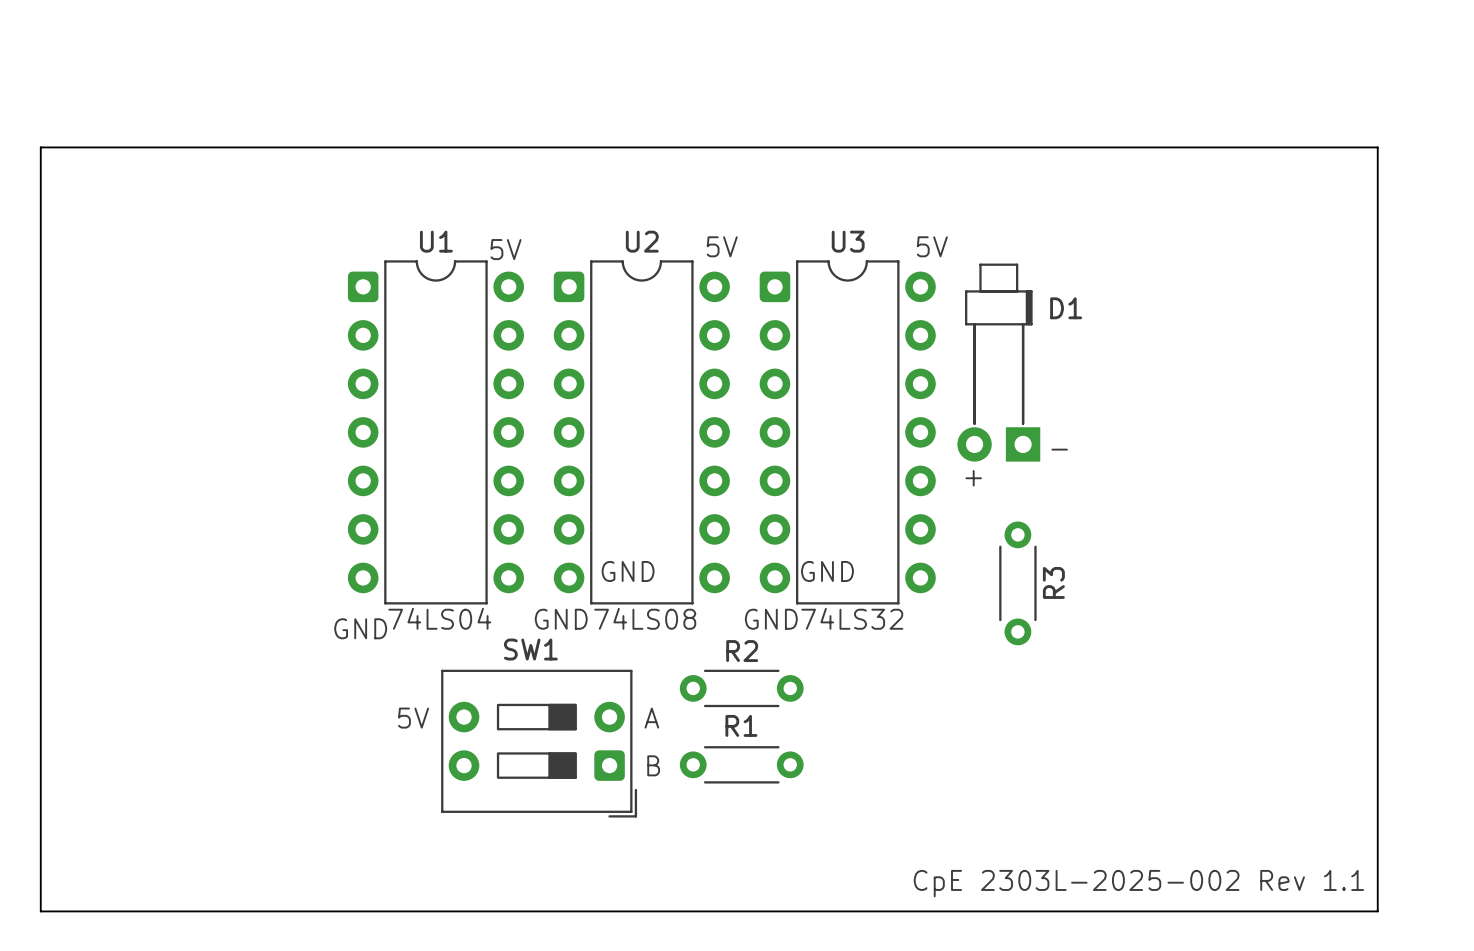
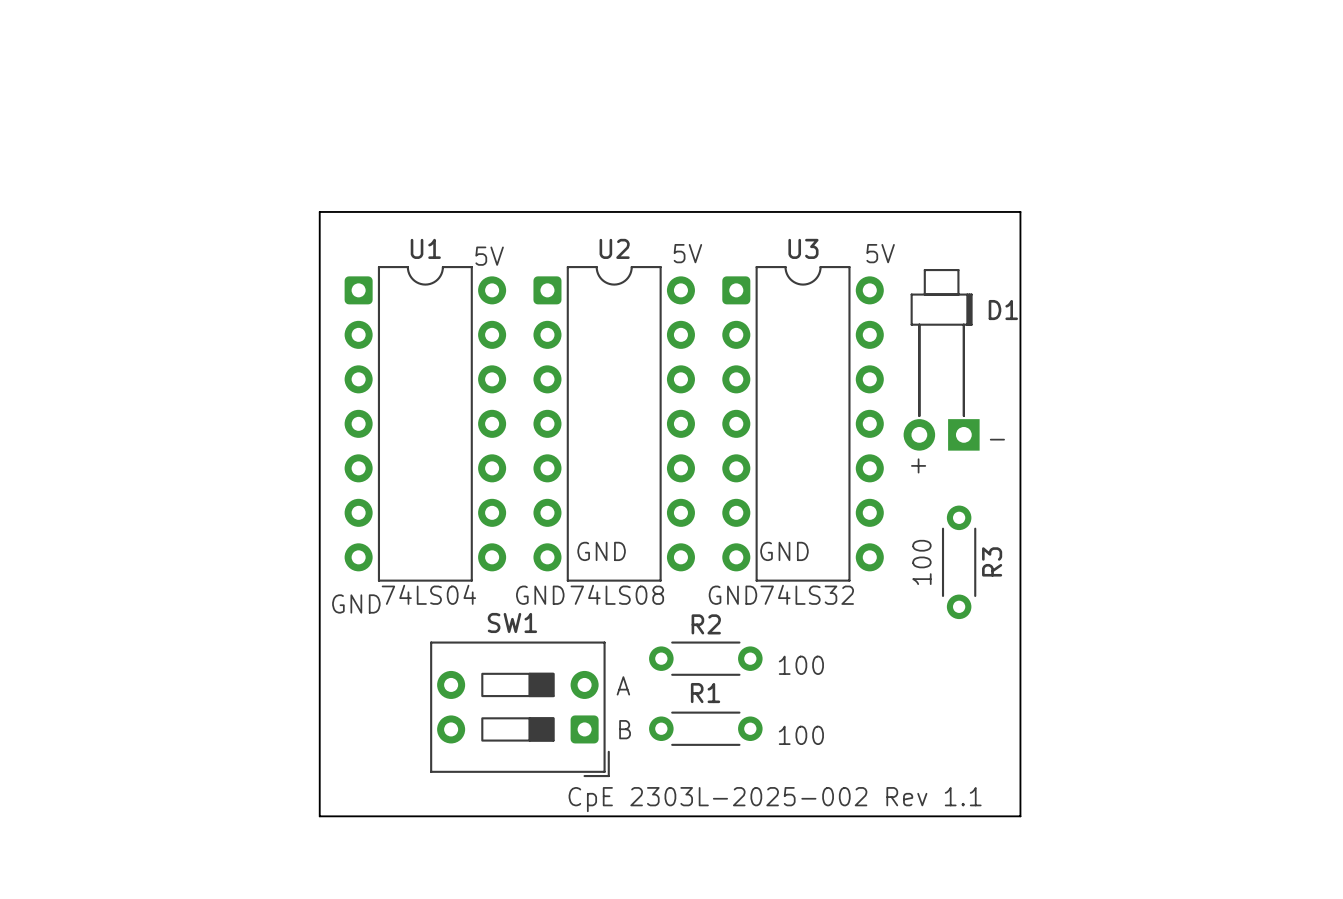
board edge: (40, 147) (1377, 147) (1377, 911) (40, 911) (40, 147) -> none
board edge: none -> (319, 211) (1020, 211) (1020, 816) (319, 816) (319, 211)
text: none -> 100 (921, 562)
text: none -> 100 (801, 665)
text: 5V (413, 718) -> none
text: none -> 100 (801, 735)
text position: CpE 2303L-2025-002 Rev 1.1 (1138, 883) -> CpE 2303L-2025-002 Rev 1.1 (775, 799)

